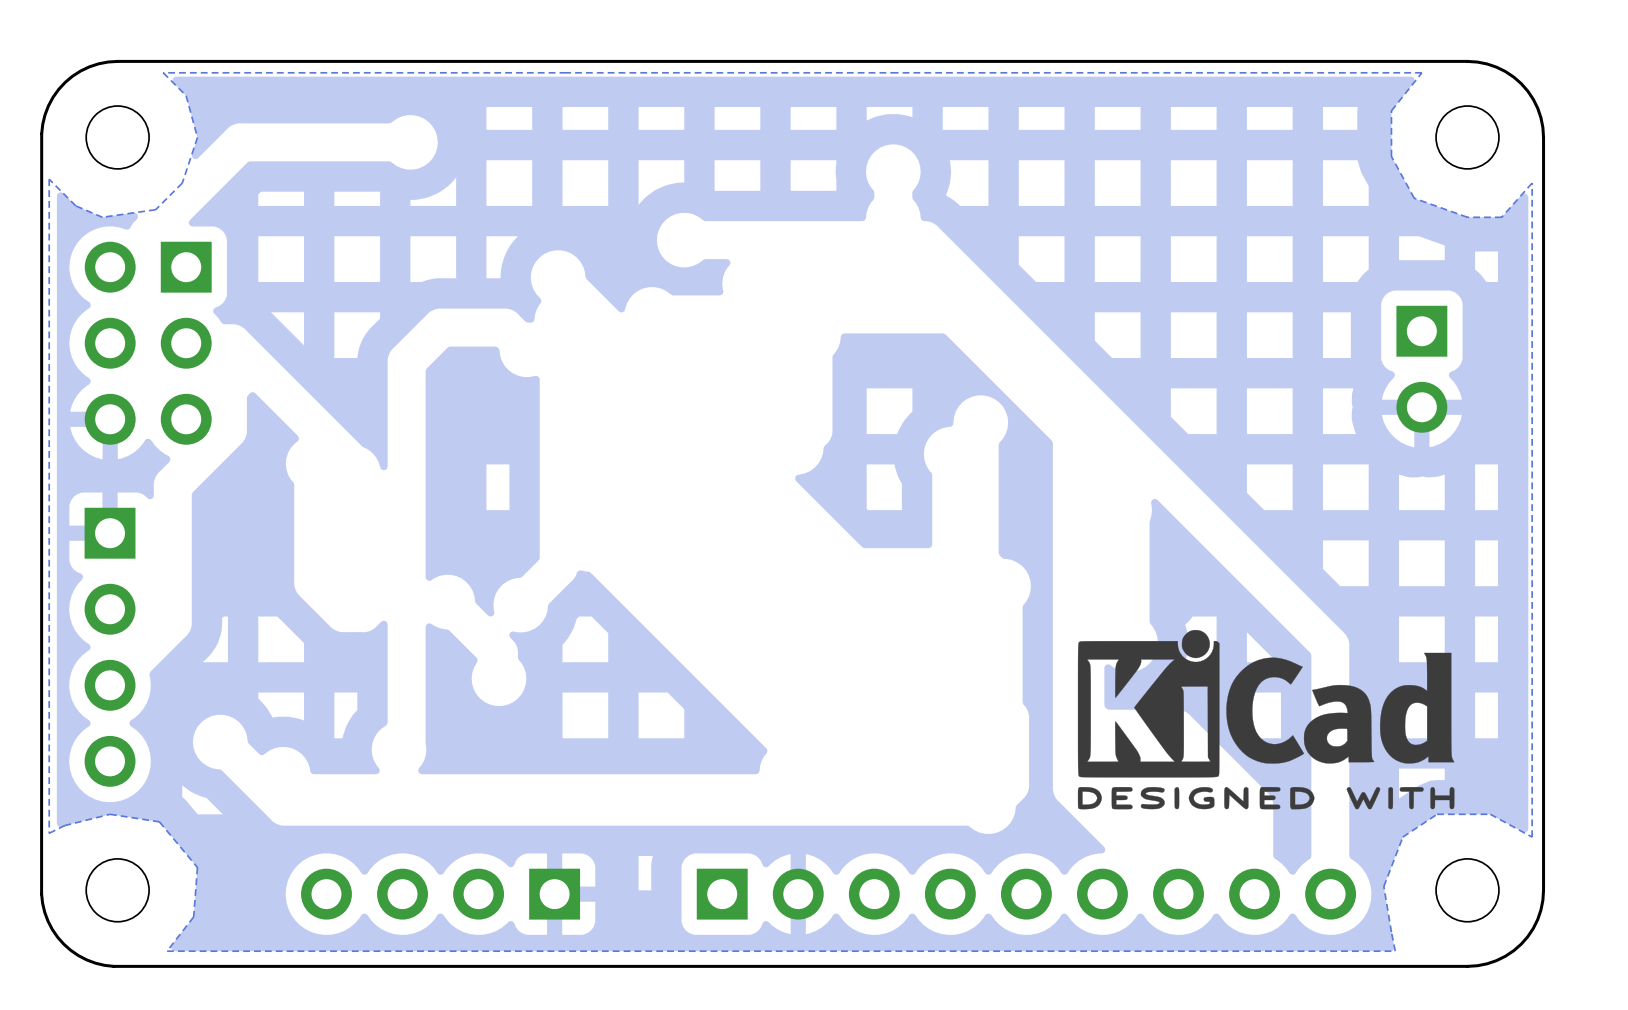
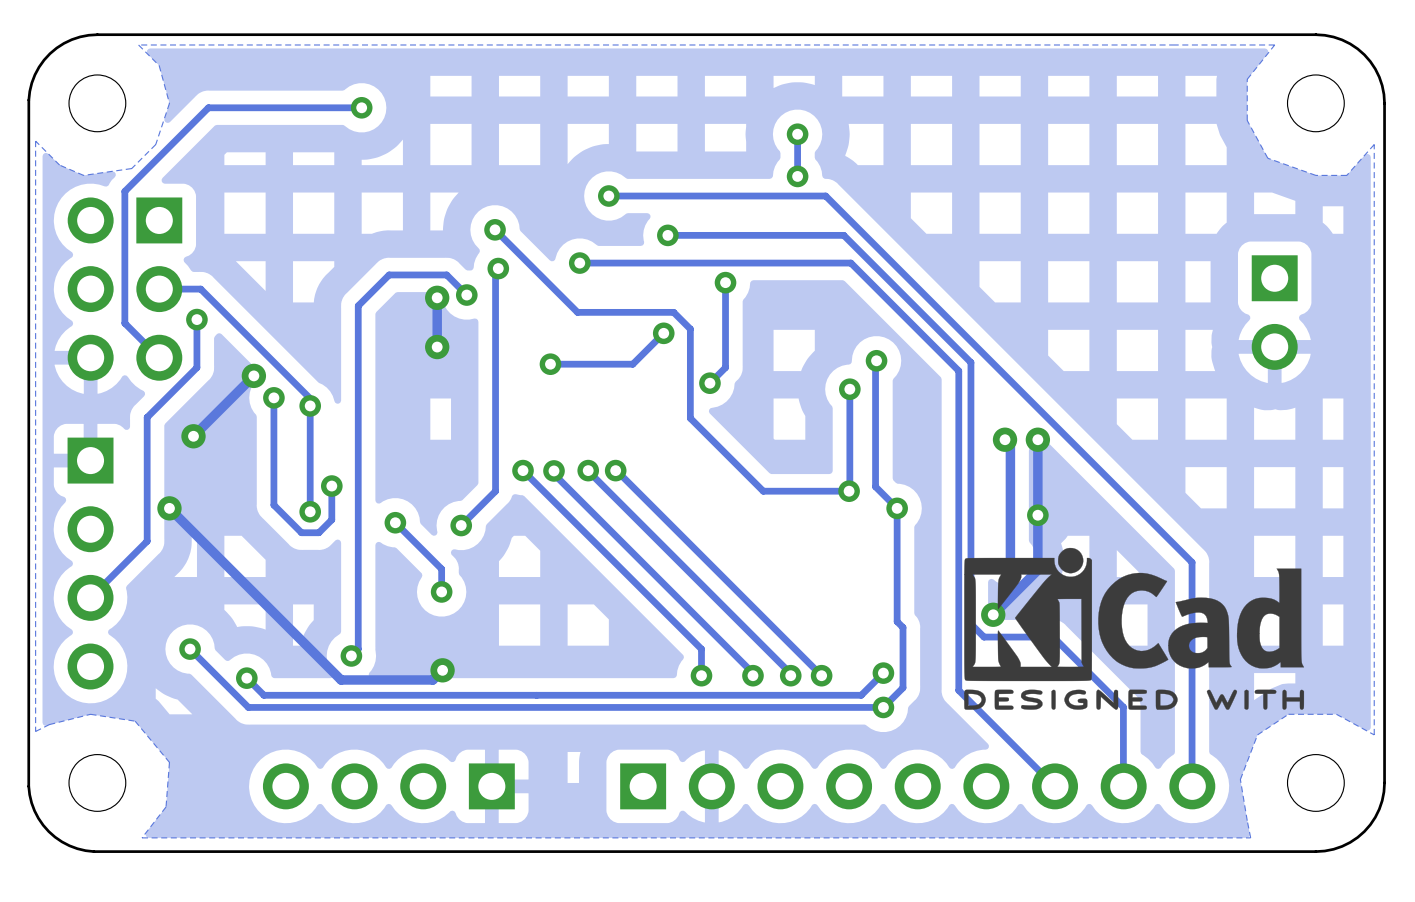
track: none -> (361, 107) (208, 107) (124, 191) (124, 323) (159, 357)
via: none -> (361, 107)
track: none -> (797, 134) (797, 176)
via: none -> (797, 134)
via: none -> (797, 176)
track: none -> (608, 196) (825, 196) (1192, 562) (1192, 786)
via: none -> (608, 196)
track: none -> (495, 229) (577, 312) (673, 312) (690, 329) (690, 418) (763, 491) (849, 490) (849, 389)
via: none -> (495, 229)
track: none -> (667, 235) (843, 235) (970, 362) (970, 624) (984, 637) (1053, 637) (1123, 707) (1123, 786)
via: none -> (667, 235)
track: none -> (579, 263) (850, 263) (958, 370) (958, 690) (1054, 786)
via: none -> (579, 263)
track: none -> (498, 268) (495, 271) (495, 491) (461, 525)
via: none -> (498, 268)
track: none -> (725, 282) (725, 367) (709, 383)
via: none -> (725, 282)
track: none -> (159, 289) (200, 289) (310, 398)
track: none -> (466, 295) (446, 274) (389, 274) (358, 305) (358, 649) (351, 655)
via: none -> (466, 295)
track: none -> (437, 297) (437, 347)
via: none -> (437, 297)
track: none -> (196, 319) (196, 367) (147, 417) (147, 541) (90, 597)
via: none -> (196, 319)
track: none -> (663, 333) (632, 364) (550, 364)
via: none -> (663, 333)
via: none -> (437, 347)
track: none -> (876, 360) (875, 486) (897, 508) (897, 621) (903, 627) (903, 687) (883, 707) (248, 707) (190, 649)
via: none -> (876, 360)
via: none -> (550, 364)
track: none -> (253, 375) (193, 436)
via: none -> (253, 375)
via: none -> (709, 383)
via: none -> (849, 389)
track: none -> (273, 397) (273, 505) (301, 532) (318, 532) (331, 519) (331, 486)
via: none -> (273, 397)
track: none -> (310, 405) (310, 511)
via: none -> (310, 405)
via: none -> (193, 436)
track: none -> (1005, 439) (1010, 445) (1010, 559)
via: none -> (1005, 439)
track: none -> (1037, 439) (1037, 570) (993, 614)
via: none -> (1037, 439)
track: none -> (523, 470) (701, 649) (701, 675)
via: none -> (523, 470)
track: none -> (554, 470) (554, 474) (752, 673) (752, 675)
via: none -> (554, 470)
track: none -> (588, 471) (790, 675)
via: none -> (588, 470)
track: none -> (615, 470) (821, 675)
via: none -> (615, 470)
via: none -> (331, 486)
via: none -> (849, 491)
track: none -> (169, 508) (341, 679) (432, 679) (442, 670)
via: none -> (169, 508)
via: none -> (897, 508)
via: none -> (310, 511)
via: none -> (1037, 515)
track: none -> (395, 522) (441, 569) (441, 591)
via: none -> (395, 522)
via: none -> (461, 525)
via: none -> (441, 591)
via: none -> (993, 614)
via: none -> (190, 649)
via: none -> (351, 655)
via: none -> (442, 670)
track: none -> (883, 673) (861, 695) (263, 695) (246, 678)
via: none -> (883, 673)
via: none -> (701, 675)
via: none -> (752, 675)
via: none -> (790, 675)
via: none -> (821, 675)
via: none -> (246, 678)
via: none -> (883, 707)

